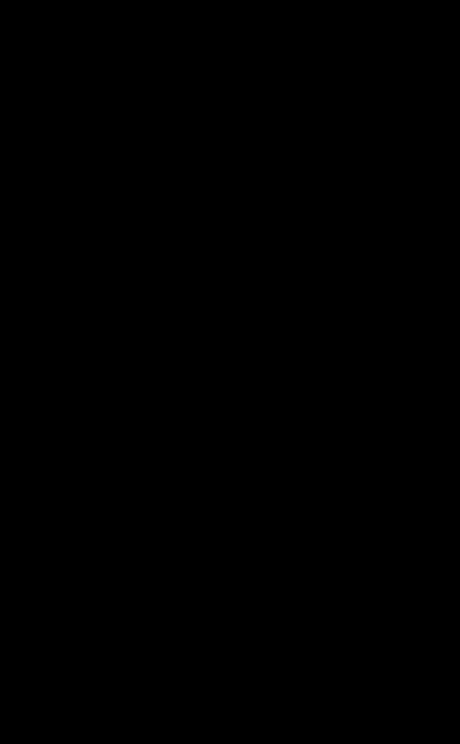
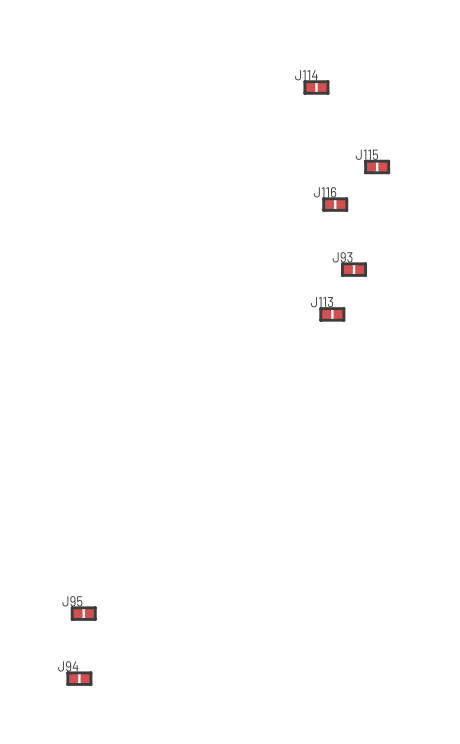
J114: none -> (316, 87)
J115: none -> (377, 166)
J116: none -> (335, 204)
J93: none -> (354, 269)
J113: none -> (332, 314)
J95: none -> (83, 613)
J94: none -> (79, 678)

